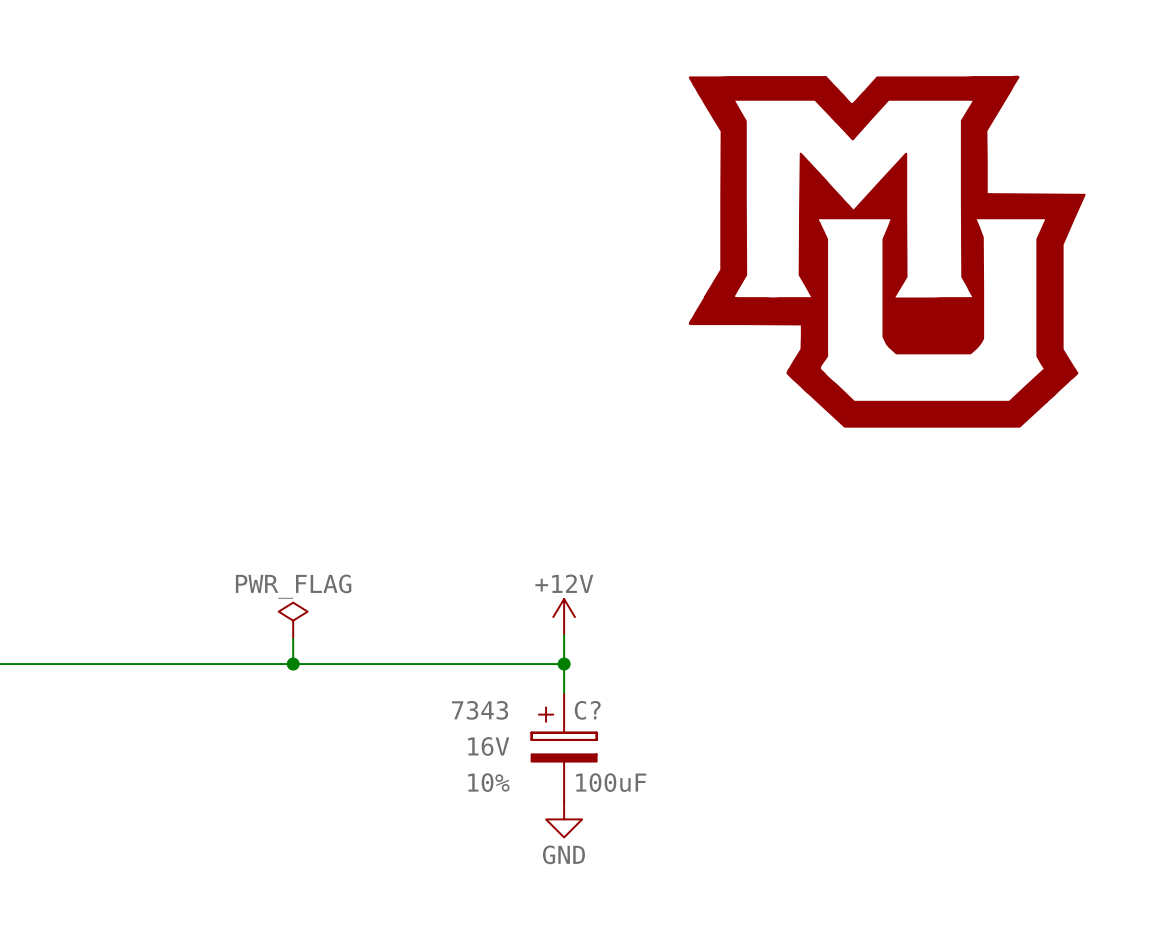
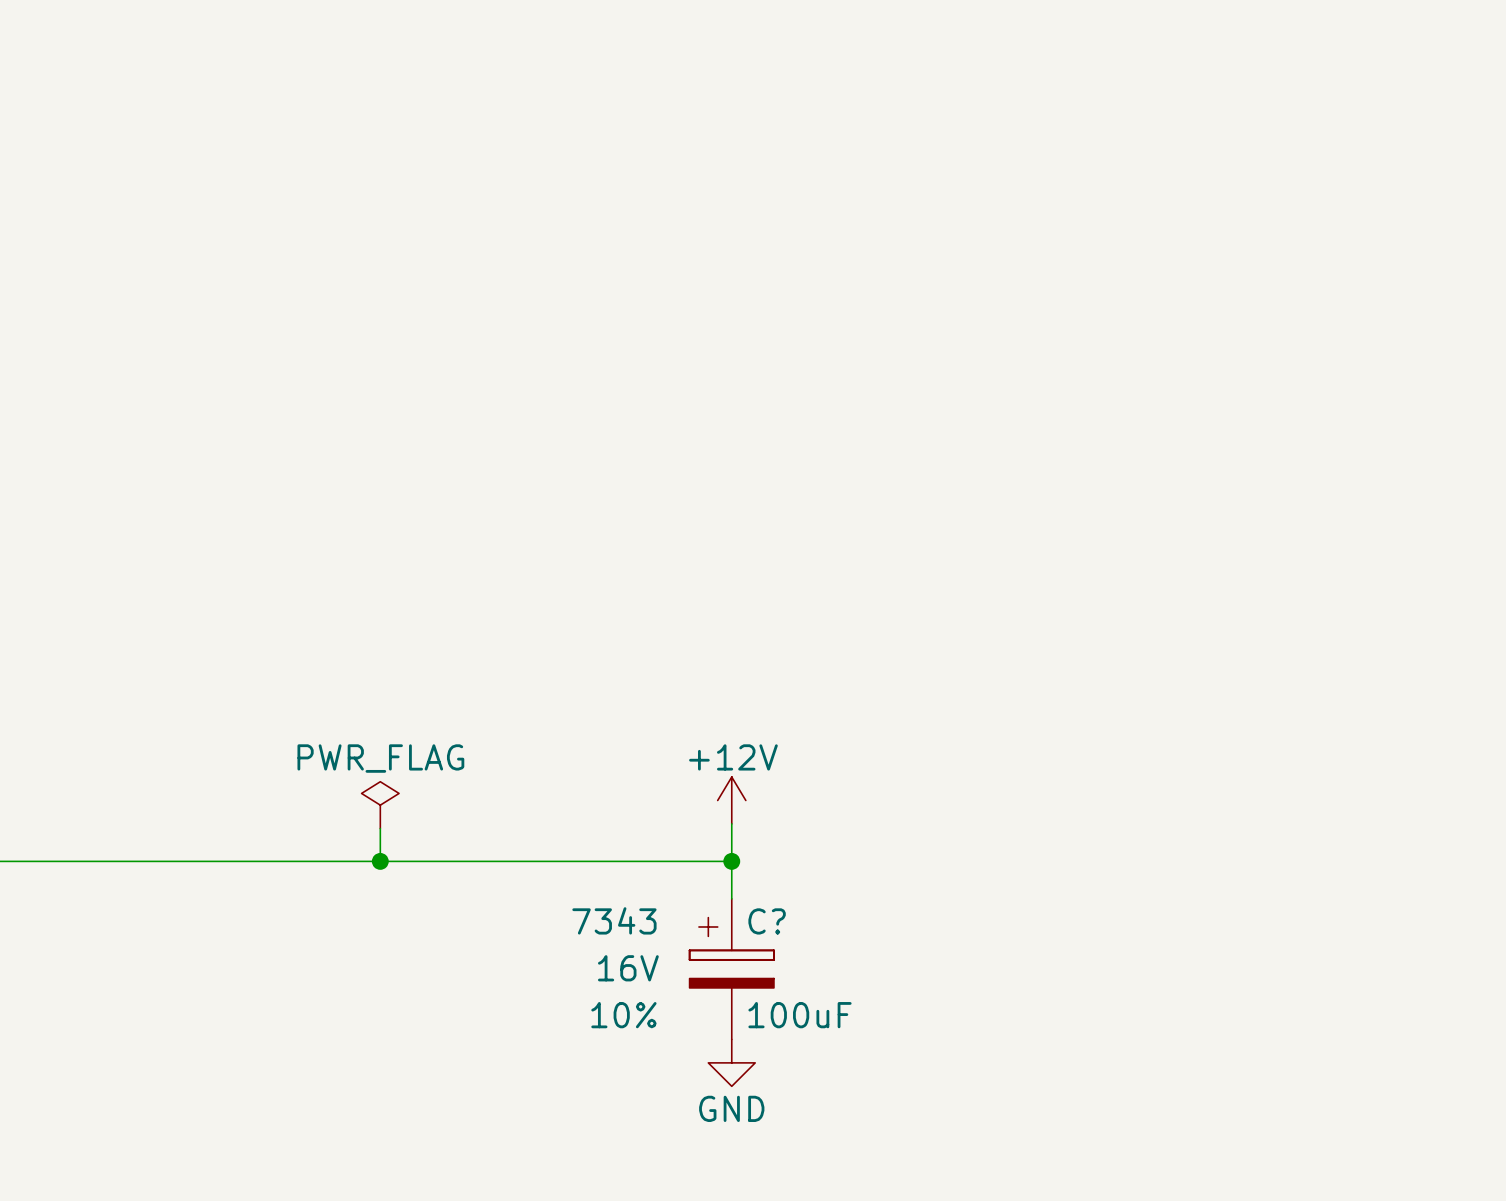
power symbol: (887, 251) -> none

